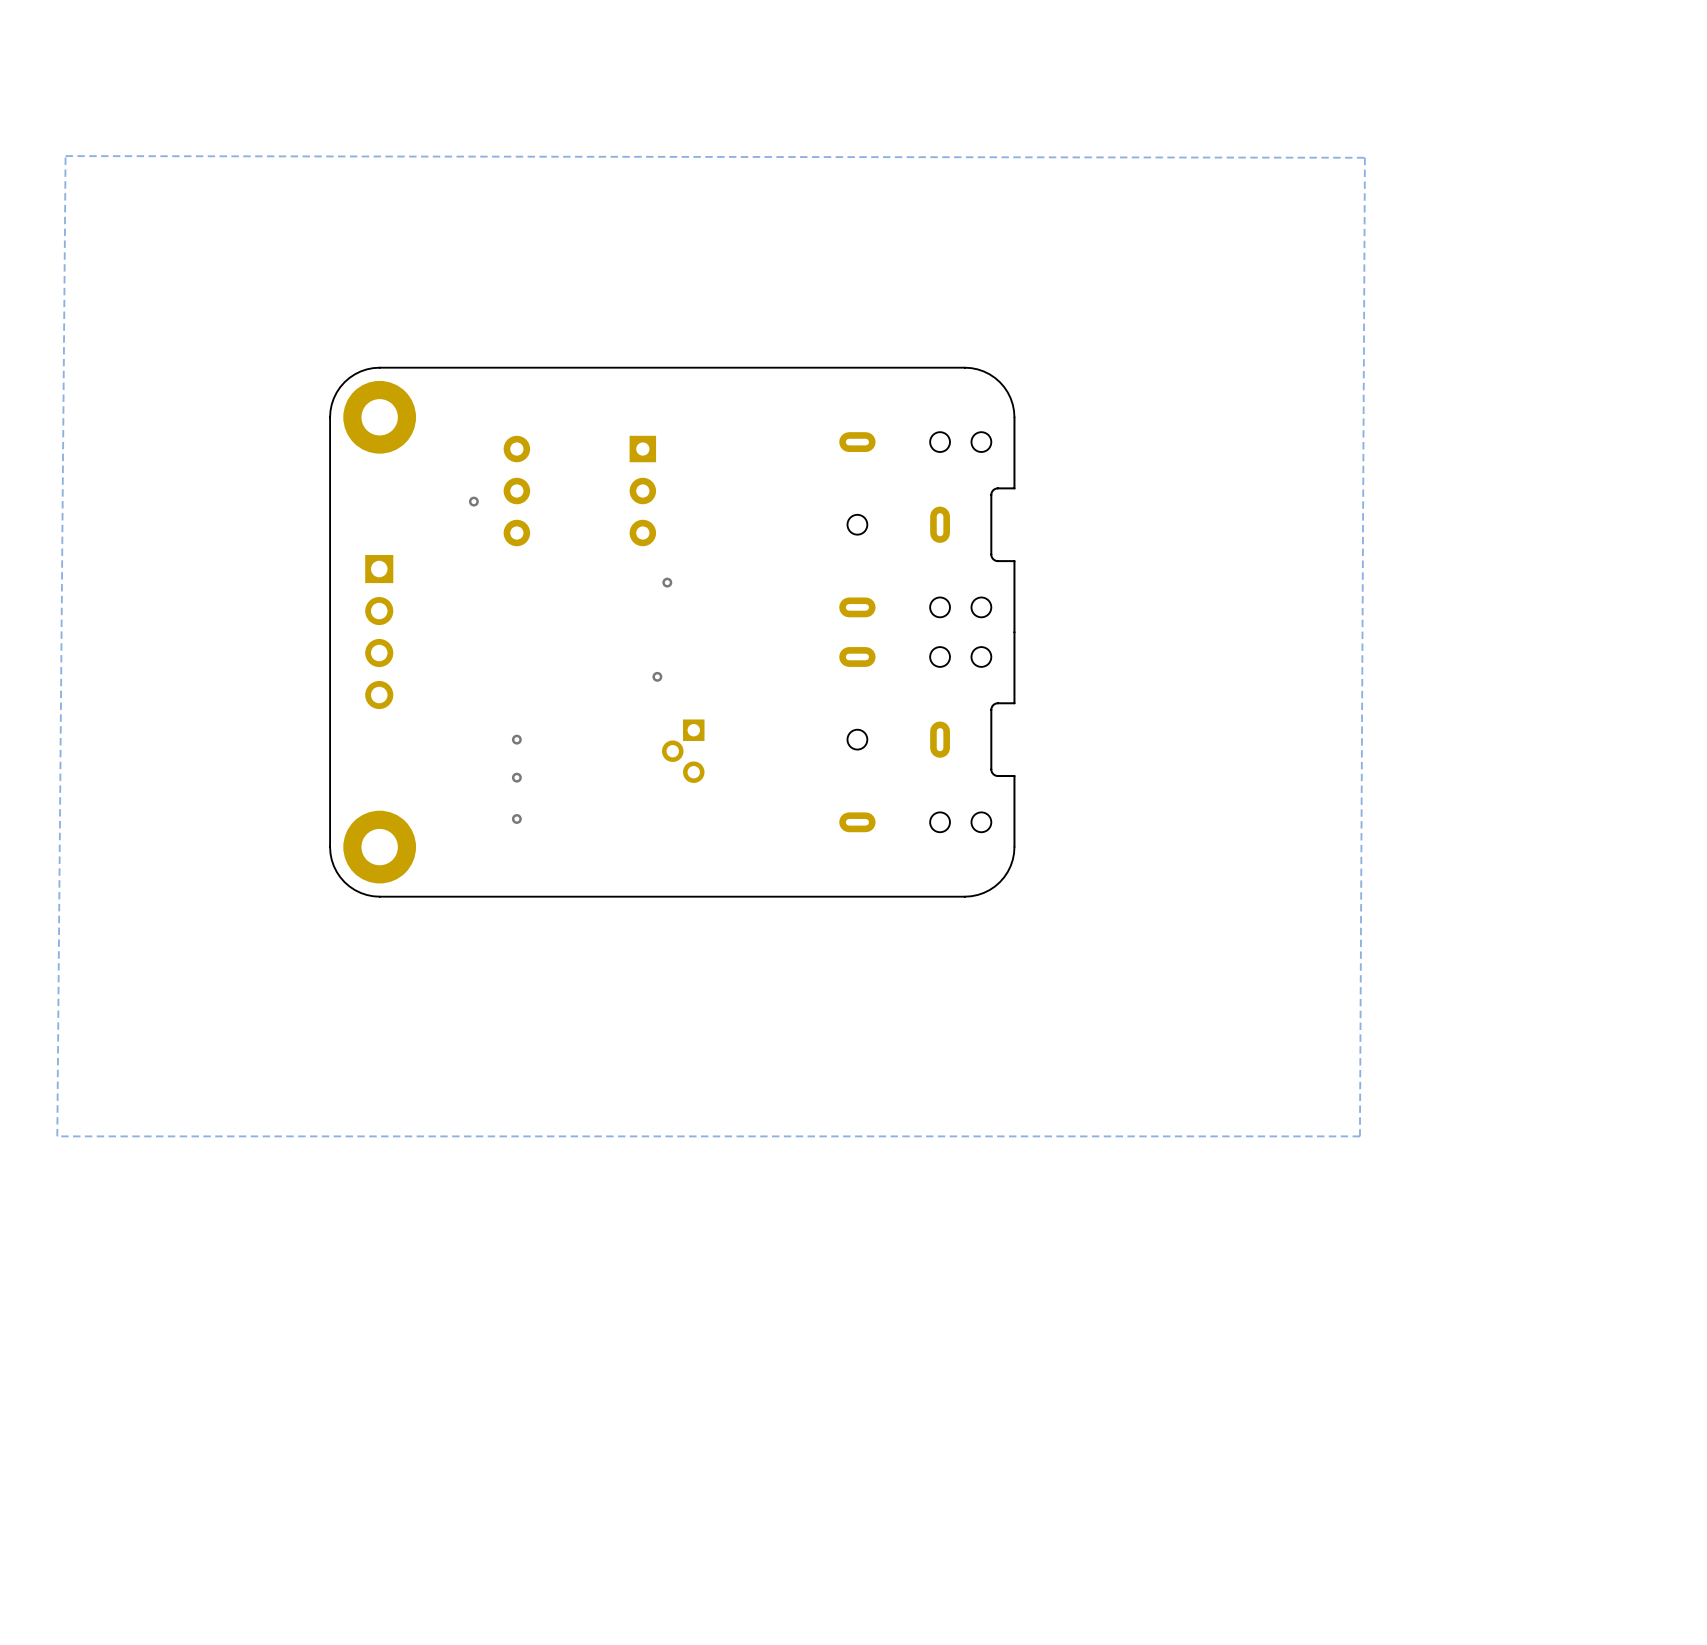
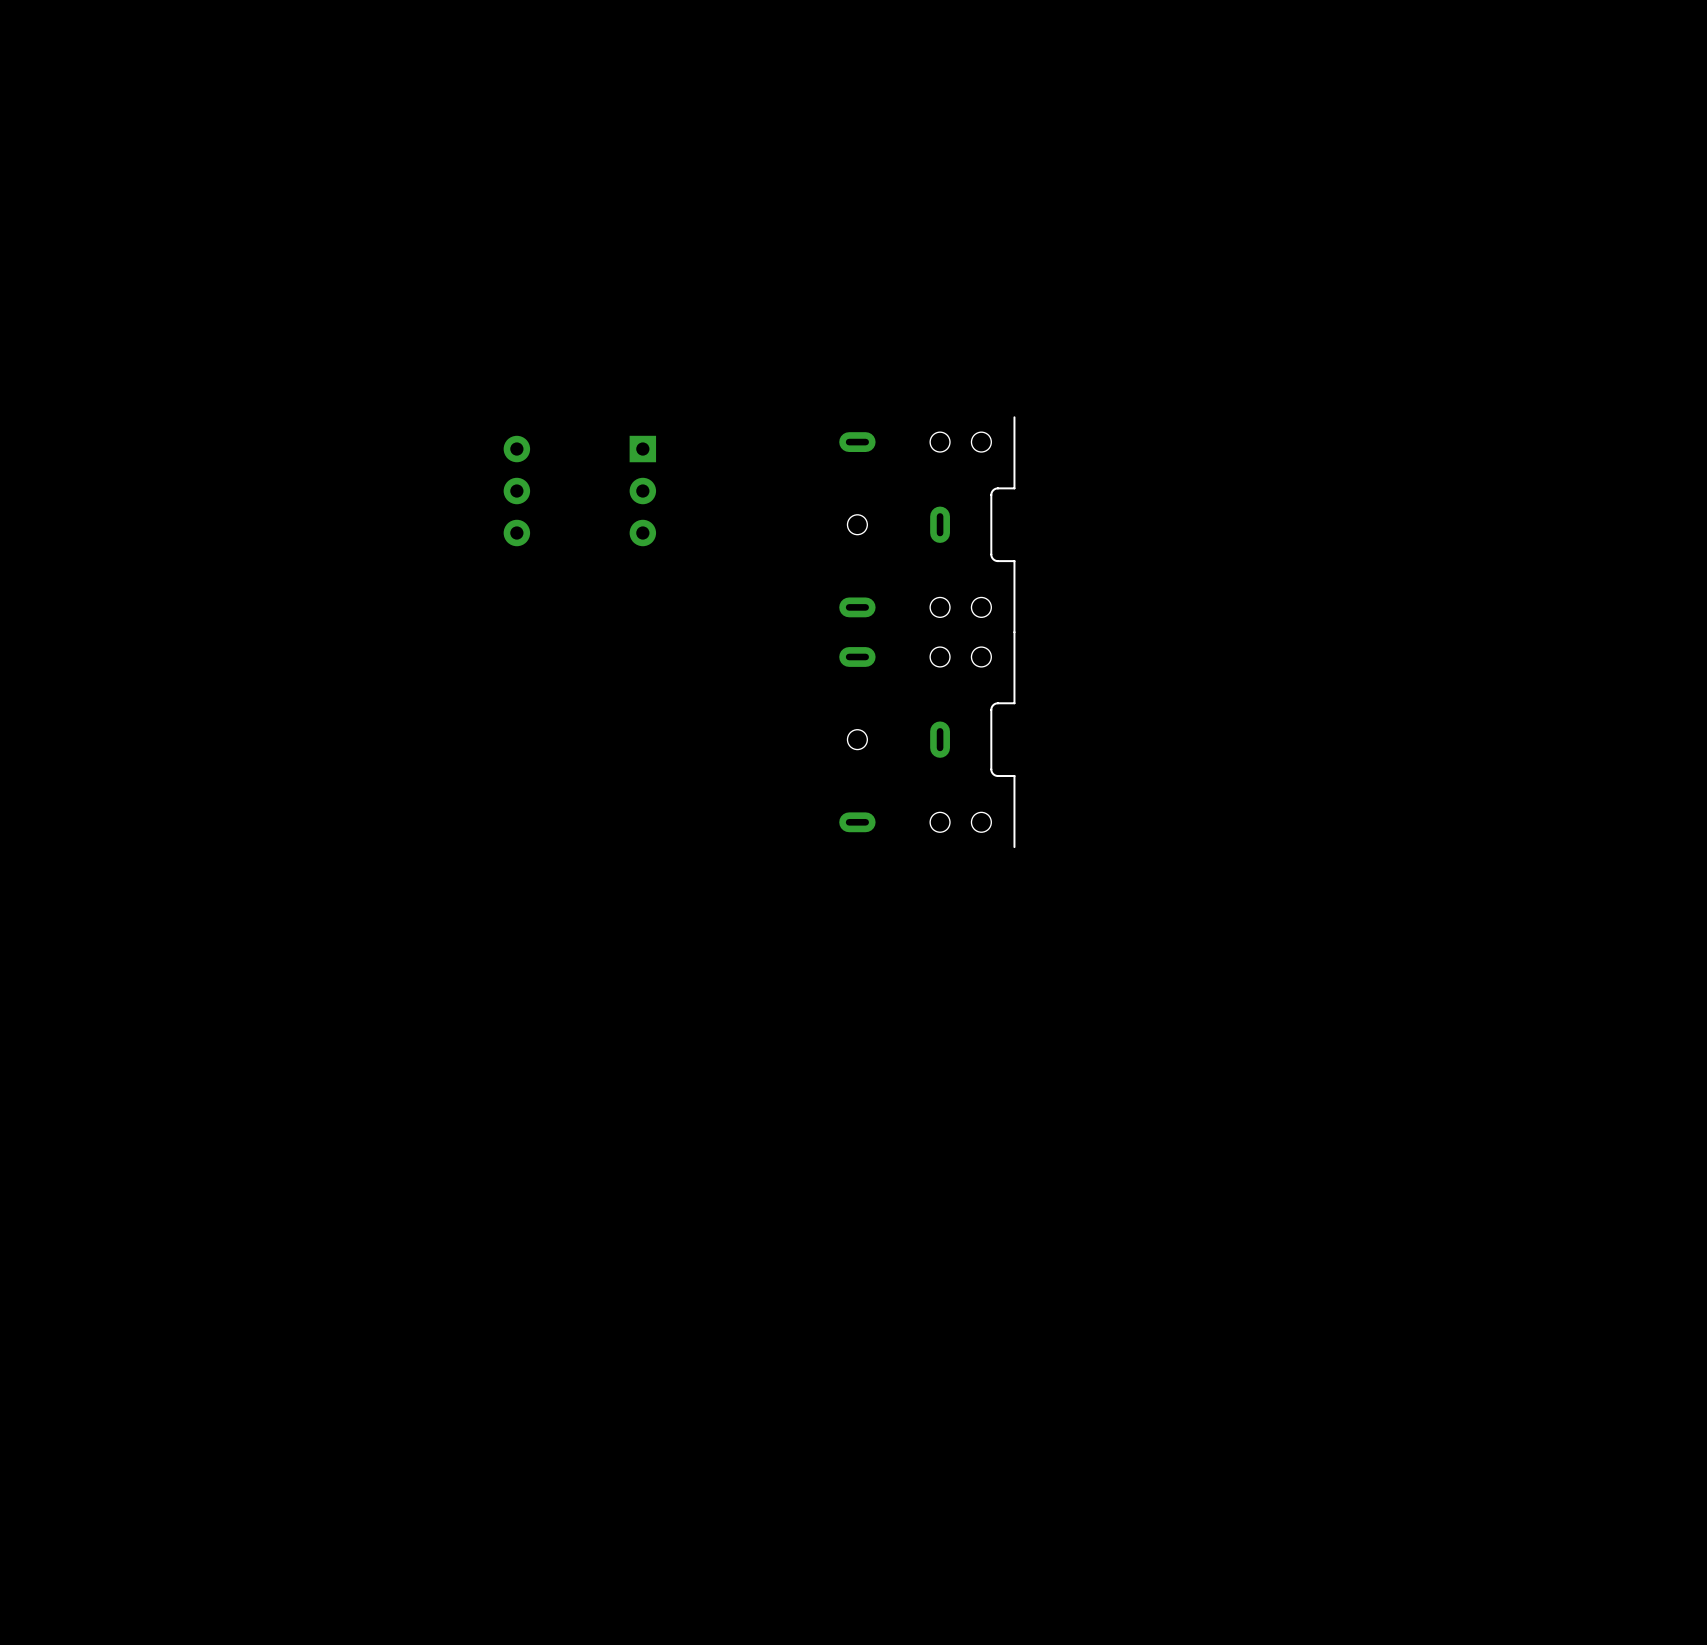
zone outline: (65, 156) (57, 1136) (1359, 1136) (1364, 157) (65, 156) -> none
part: (379, 417) -> none
board edge: (1014, 417) (1010, 398) (999, 382) (983, 371) (964, 367) (373, 368) (354, 374) (340, 387) (331, 404) (330, 417) (330, 847) (331, 859) (336, 871) (344, 882) (354, 890) (366, 894) (379, 896) (964, 896) (983, 892) (999, 882) (1010, 866) (1014, 847) -> none
via: (473, 501) -> none
via: (667, 582) -> none
part: (379, 632) -> none
via: (657, 676) -> none
via: (516, 739) -> none
part: (683, 751) -> none
via: (516, 777) -> none
via: (516, 818) -> none
part: (379, 847) -> none

